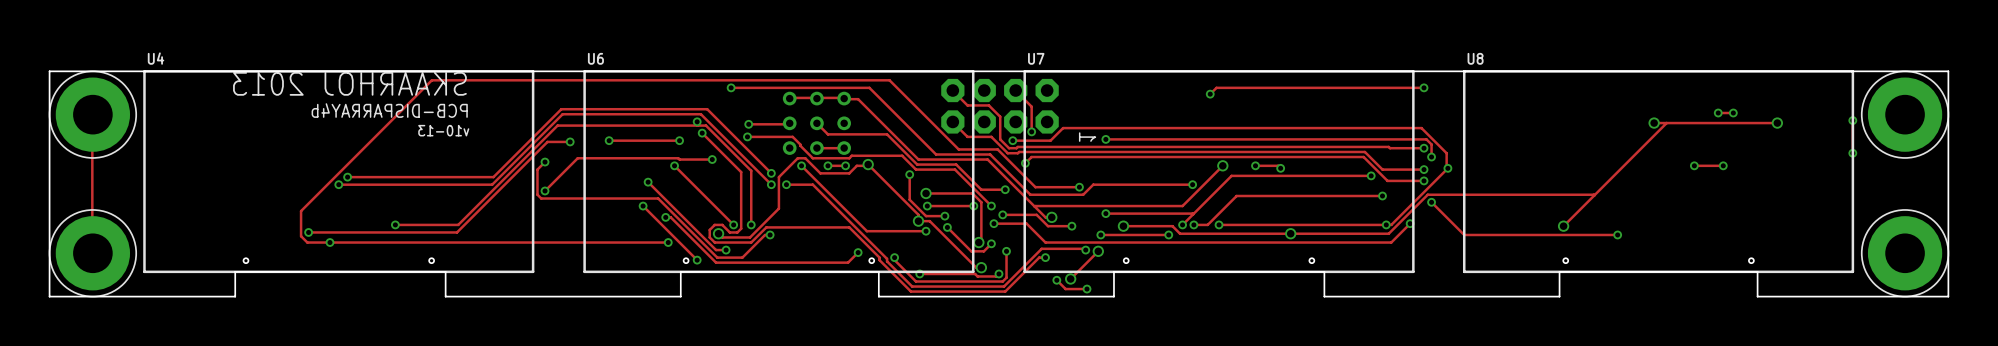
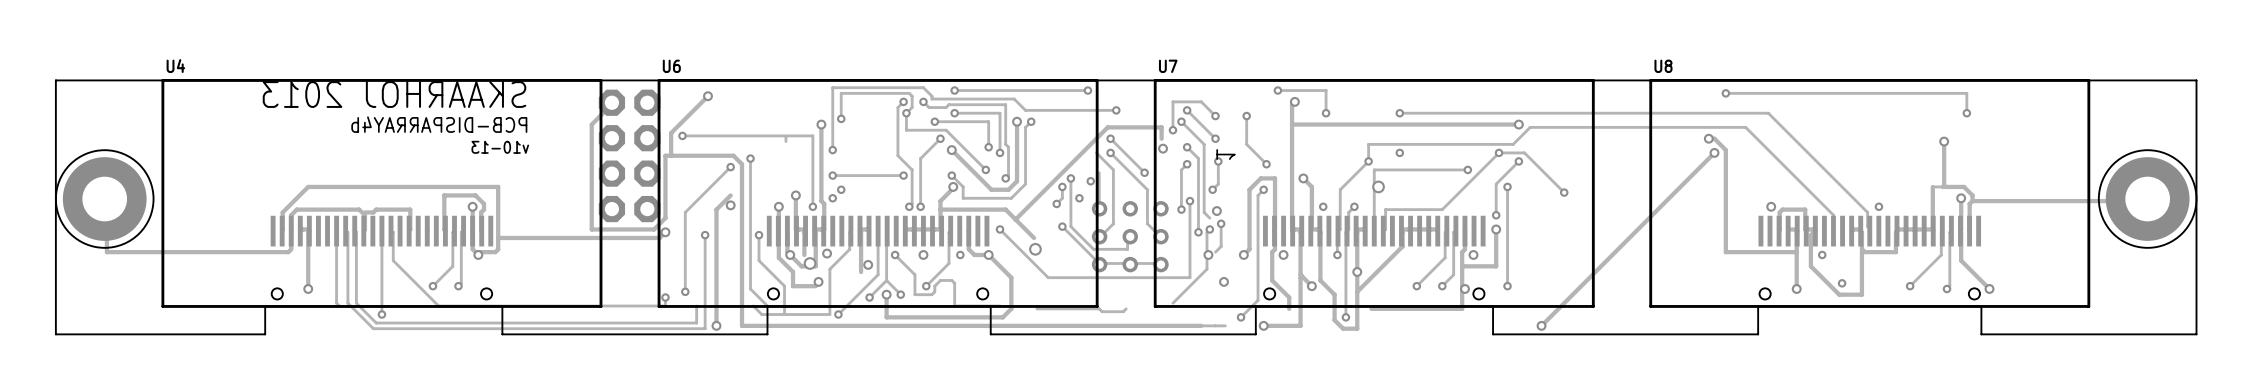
U4 footprint: [143, 70, 535, 274] -> [161, 79, 603, 308]
U6 footprint: [583, 70, 975, 274] -> [657, 79, 1099, 308]
U7 footprint: [1023, 70, 1415, 274] -> [1153, 79, 1595, 308]
U8 footprint: [1462, 70, 1855, 274] -> [1649, 79, 2091, 308]
track: (846, 80) (431, 80) (323, 188) -> (409, 231) (410, 209) (376, 209) (373, 212) (364, 212)
via: none -> (954, 90)
track: (889, 80) (958, 149) (997, 149) (1035, 187) (1079, 187) -> (1002, 90) (1087, 90)
via: none -> (1087, 90)
track: none -> (1277, 90) (1326, 90) (1326, 113)
via: none -> (1277, 90)
track: none -> (1725, 93) (1966, 93) (1966, 113)
via: none -> (1725, 93)
track: none -> (707, 96) (671, 133) (671, 155)
via: none -> (707, 96)
track: (731, 87) (826, 87) -> (832, 150) (832, 87) (923, 87) (931, 96) (931, 99)
via: (731, 87) -> none
track: (869, 87) (936, 154) (990, 154) (1030, 194) (1083, 194) (1093, 184) (1192, 184) -> (980, 99) (1014, 99) (1025, 110) (1116, 110)
track: (1424, 87) (1216, 87) (1210, 94) -> none
via: (1424, 87) -> none
track: none -> (903, 101) (897, 107) (897, 155) (912, 169) (912, 203) (909, 206)
via: none -> (903, 101)
track: none -> (923, 101) (929, 107) (946, 107) (948, 104) (1005, 104) (1005, 144) (1008, 147) (1008, 175) (1005, 178)
via: none -> (923, 101)
track: (952, 90) (967, 105) (988, 105) (1000, 116) (1000, 139) (1009, 148) (1424, 148) -> none
track: (1015, 90) (1031, 106) (1031, 131) -> none
track: none -> (1294, 101) (1292, 104) (1292, 229) (1292, 231) (1294, 229) (1301, 231) (1300, 274) (1311, 286)
via: none -> (1294, 101)
via: (1210, 94) -> none
via: none -> (1116, 110)
track: none -> (1187, 110) (1215, 138)
via: none -> (1187, 110)
track: (789, 98) (858, 99) (918, 159) (987, 159) (1045, 217) (1051, 217) -> none
via: none -> (906, 113)
track: none -> (954, 113) (1000, 113) (1000, 152)
via: none -> (954, 113)
via: none -> (1326, 113)
track: none -> (1399, 113) (1768, 113) (1867, 212) (1867, 226) (1869, 231)
via: none -> (1399, 113)
via: none -> (1966, 113)
track: none -> (1215, 116) (1201, 101) (1172, 101) (1172, 130)
via: none -> (1215, 116)
track: none -> (1246, 116) (1246, 144) (1266, 164)
via: none -> (1246, 116)
track: none -> (841, 118) (841, 93) (909, 93) (912, 96) (912, 107) (906, 113) (906, 130) (946, 130) (985, 169)
via: none -> (841, 118)
part: (999, 106) -> none
track: none -> (934, 121) (988, 121) (988, 147)
via: none -> (934, 121)
track: none -> (1017, 121) (1017, 181) (1008, 189) (991, 189) (951, 150)
via: none -> (1017, 121)
track: none -> (1031, 121) (1025, 127) (1025, 184) (1011, 198) (963, 198) (963, 186) (951, 175)
via: none -> (1031, 121)
track: none -> (1181, 121) (1204, 144) (1204, 212) (1209, 218)
via: none -> (1181, 121)
track: none -> (821, 124) (821, 201) (824, 203) (824, 229) (823, 231) (821, 229) (814, 231) (815, 266) (801, 266) (787, 252) (787, 231)
via: none -> (821, 124)
track: none -> (1292, 124) (1518, 124)
via: none -> (1518, 124)
track: (1718, 113) (1733, 113) -> none
via: (1718, 113) -> none
via: (1733, 113) -> none
track: (92, 114) (92, 253) -> none
part: (92, 114) -> none
part: (1905, 114) -> none
via: none -> (1172, 130)
track: none -> (682, 135) (812, 135) (812, 206)
via: none -> (682, 135)
via: (1852, 120) -> none
via: (697, 121) -> none
track: (952, 121) (967, 136) (991, 136) (1007, 153) (1364, 151) (1382, 169) (1424, 169) -> none
track: (789, 123) (748, 124) -> none
track: (816, 123) (827, 134) (887, 134) (917, 164) (956, 164) (981, 189) (1005, 189) -> none
part position: (816, 123) -> (1130, 236)
track: none -> (940, 138) (920, 158) (920, 206)
via: none -> (940, 138)
track: none -> (1110, 138) (1144, 172)
via: none -> (1110, 138)
track: none -> (1161, 138) (1161, 127) (1107, 127) (1015, 219)
via: none -> (1215, 138)
track: none -> (1708, 138) (1714, 138) (1725, 150) (1725, 252) (1796, 252)
via: none -> (1708, 138)
track: (1654, 123) (1777, 123) -> none
via: (1654, 123) -> none
track: (1666, 123) (1563, 226) -> none
via: (1777, 123) -> none
via: (748, 124) -> none
track: none -> (1944, 141) (1944, 186)
via: none -> (1944, 141)
track: (1214, 128) (1063, 128) (1050, 140) (1012, 140) -> (1368, 144) (1368, 161) (1340, 189) (1340, 229) (1337, 232) (1337, 254)
track: (1342, 128) (1421, 128) (1446, 153) (1447, 168) (1391, 224) (1219, 224) -> (1513, 144) (1530, 127) (1745, 127) (1833, 215) (1833, 231)
via: none -> (988, 147)
track: none -> (1187, 147) (1198, 158) (1198, 232)
via: none -> (1187, 147)
track: (702, 133) (741, 172) (741, 228) (737, 232) (729, 232) (722, 224) (714, 224) (709, 229) (709, 237) (714, 242) (751, 242) (766, 227) (849, 227) (910, 291) (1005, 291) (1039, 257) (1045, 257) -> none
via: (702, 133) -> none
via: none -> (832, 150)
via: none -> (951, 150)
via: none -> (1000, 152)
track: none -> (1096, 152) (1113, 169) (1113, 223) (1099, 236)
track: none -> (1110, 152) (1147, 189) (1147, 223) (1160, 236)
via: none -> (1110, 152)
via: none -> (1399, 152)
via: none -> (1499, 152)
track: none -> (1714, 152) (1541, 325)
via: none -> (1714, 152)
track: (747, 136) (792, 136) (812, 158) (902, 155) (915, 169) (954, 169) (991, 206) -> none
via: (747, 136) -> none
part: none -> (629, 155)
track: (1105, 139) (1426, 139) (1431, 144) (1431, 157) -> none
via: (1105, 139) -> none
track: (609, 140) (679, 140) -> none
via: (609, 140) -> none
track: none -> (750, 158) (750, 289) (767, 306)
via: none -> (750, 158)
via: (679, 140) -> none
via: (1012, 140) -> none
track: (570, 141) (547, 141) (456, 232) (308, 232) -> none
via: (570, 141) -> none
track: none -> (1218, 161) (1218, 184) (1212, 189)
via: none -> (1218, 161)
via: none -> (1368, 161)
track: none -> (1518, 161) (1496, 184) (1496, 215)
via: none -> (1518, 161)
track: none -> (1187, 164) (1181, 169) (1181, 209)
via: none -> (1187, 164)
via: none -> (1266, 164)
track: none -> (730, 167) (685, 212) (685, 291)
via: none -> (730, 167)
track: (816, 148) (844, 148) -> none
via: (1424, 148) -> none
via: none -> (985, 169)
track: none -> (1467, 169) (1374, 169) (1374, 231)
via: none -> (1467, 169)
track: none -> (1099, 172) (1099, 208)
via: none -> (1144, 172)
via: (1852, 153) -> none
track: none -> (832, 175) (903, 175)
via: none -> (832, 175)
via: none -> (903, 175)
via: none -> (951, 175)
via: (1431, 157) -> none
via: none -> (1005, 178)
track: none -> (1070, 178) (1070, 226) (1093, 249) (1127, 249) (1127, 237) (1130, 236)
via: none -> (1070, 178)
track: none -> (1303, 178) (1311, 186) (1311, 229) (1317, 229) (1320, 232) (1320, 280) (1334, 294) (1334, 320) (1343, 328) (1357, 328) (1356, 231) (1357, 229) (1365, 231)
via: none -> (1303, 178)
track: (712, 159) (577, 158) (545, 190) -> none
via position: (712, 159) -> (795, 195)
via: none -> (1090, 181)
track: (545, 162) (537, 169) (537, 194) (541, 198) (658, 198) (717, 257) (742, 257) (765, 234) (770, 234) -> none
via: (545, 162) -> none
track: (1025, 163) (1031, 157) (1363, 157) (1387, 180) (1424, 180) -> none
via: (1025, 163) -> none
via: (868, 164) -> none
track: (674, 165) (733, 224) -> none
via: (674, 165) -> none
track: (801, 165) (866, 231) (926, 231) -> none
via: (801, 165) -> none
track: (827, 165) (845, 165) -> none
via: (827, 165) -> none
track: none -> (1062, 186) (1062, 198) (1056, 203)
via: none -> (1062, 186)
track: (1222, 165) (1182, 206) (1034, 206) -> none
track: (1255, 165) (1278, 165) (1280, 168) -> none
via: (1255, 165) -> none
track: none -> (1507, 186) (1507, 286)
via: none -> (1507, 186)
track: (1694, 165) (1714, 165) -> (1932, 229) (1932, 186)
via: (1694, 165) -> none
track: none -> (1942, 186) (1964, 186) (1972, 195) (1972, 201)
via position: (1723, 165) -> (1961, 198)
via: none -> (841, 189)
track: none -> (951, 189) (940, 201) (940, 229) (932, 231) (931, 229) (914, 229) (914, 231) (906, 229) (905, 231)
via: none -> (1212, 189)
track: none -> (1263, 189) (1258, 195) (1258, 300) (1241, 317)
via: none -> (1263, 189)
via: (1280, 168) -> none
via: (1447, 168) -> none
via: (1424, 169) -> none
track: none -> (1564, 192) (1524, 152) (1499, 152) (1442, 209) (1385, 209) (1385, 229) (1383, 231)
via: none -> (1564, 192)
track: none -> (730, 195) (716, 209) (716, 325)
track: none -> (795, 195) (795, 229) (796, 231) (798, 229) (805, 231) (804, 254)
track: (771, 173) (707, 109) (561, 109) (493, 177) (347, 177) -> none
via: (771, 173) -> none
track: (909, 174) (909, 199) (926, 216) (944, 216) -> none
via: (909, 174) -> none
via: none -> (832, 198)
via: none -> (1079, 198)
track: (1371, 175) (1231, 175) (1182, 224) -> none
via: (1371, 175) -> none
track: none -> (1961, 198) (1961, 260) (1989, 289)
track: none -> (104, 199) (106, 201) (106, 252) (288, 252) (291, 249) (291, 215) (296, 209) (359, 209) (364, 215) (363, 231)
part: none -> (104, 199)
track: none -> (2147, 199) (2145, 201) (1972, 201)
part: none -> (2147, 199)
via: (347, 177) -> none
track: none -> (1189, 201) (1189, 277) (1048, 277) (1000, 229)
via: none -> (1189, 201)
track: none -> (1972, 201) (1969, 203) (1969, 231)
via: none -> (1056, 203)
via: (1424, 180) -> none
track: (648, 182) (716, 250) (726, 250) -> none
track: none -> (472, 206) (472, 249) (478, 254) (478, 252) (495, 252) (498, 249) (498, 186) (308, 186) (282, 212) (282, 231)
via: none -> (472, 206)
track: none -> (778, 206) (778, 257) (793, 271) (793, 286) (815, 286)
via: none -> (778, 206)
via: none -> (812, 206)
via: none -> (909, 206)
via: none -> (920, 206)
via: none -> (1323, 206)
track: none -> (1354, 206) (1348, 212) (1348, 229) (1345, 232) (1345, 317)
via: none -> (1354, 206)
via: none -> (1771, 206)
via: none -> (1878, 206)
track: (338, 184) (492, 184) (562, 114) (700, 114) (771, 184) -> none
via: (338, 184) -> none
via: (771, 184) -> none
track: (786, 184) (812, 184) (912, 286) (1004, 286) (1041, 248) (1085, 250) -> none
via: (786, 184) -> none
via: (1192, 184) -> none
track: none -> (940, 209) (1005, 209) (1034, 237)
via: none -> (1181, 209)
track: (322, 189) (301, 211) (301, 236) (307, 242) (668, 242) -> none
via: (1005, 189) -> none
via: (545, 190) -> none
via: none -> (1496, 215)
track: (926, 193) (972, 193) (981, 202) (981, 240) (978, 242) -> none
via: (926, 193) -> none
track: (1594, 195) (1427, 194) (1388, 233) (1180, 233) (1172, 226) (1123, 226) -> none
track: (1382, 196) (1236, 196) (1207, 224) (1193, 224) -> none
via: (1382, 196) -> none
track: none -> (1221, 223) (1221, 246) (1215, 252)
via: none -> (1221, 223)
track: none -> (1062, 226) (1099, 264) (1160, 264)
via: none -> (1062, 226)
track: (1431, 202) (1464, 234) (1617, 234) -> none
via: (1431, 202) -> none
track: none -> (968, 229) (968, 249) (974, 254) (988, 254) (1011, 277) (1011, 308) (1002, 317) (886, 317) (886, 294)
via: none -> (1000, 229)
track: none -> (1209, 229) (1206, 232) (1206, 269) (1172, 303)
via: none -> (1209, 229)
track: none -> (1465, 229) (1465, 249) (1462, 252) (1462, 286) (1465, 289) (1462, 289) (1462, 308) (1371, 308)
track: none -> (1496, 229) (1496, 266) (1462, 266)
via: none -> (1496, 229)
track: none -> (1932, 229) (1915, 229) (1915, 231) (1898, 229) (1895, 232) (1895, 252) (1864, 252) (1861, 249) (1861, 232) (1859, 229) (1851, 231)
track: none -> (300, 231) (302, 229) (309, 231) (308, 289)
track: none -> (336, 231) (336, 303) (339, 306)
track: none -> (345, 231) (347, 232) (347, 303) (373, 328) (705, 328) (705, 235)
track: none -> (354, 231) (356, 232) (356, 303) (376, 323) (696, 323) (696, 306)
track: none -> (381, 231) (381, 314)
track: none -> (391, 231) (393, 232) (393, 260) (438, 306) (665, 306) (665, 297)
track: none -> (445, 231) (444, 195) (475, 195) (484, 203) (484, 209) (481, 212) (481, 231)
track: none -> (454, 231) (452, 232) (452, 266) (432, 286)
track: none -> (463, 231) (461, 232) (461, 283) (458, 286)
track: none -> (850, 231) (849, 249) (829, 269) (829, 314) (761, 314) (753, 306)
track: none -> (869, 231) (866, 229) (859, 231) (861, 271)
track: (778, 205) (778, 177) (797, 158) (805, 158) (820, 173) (849, 173) (856, 165) (868, 164) (918, 214) (918, 221) (929, 221) (976, 267) (981, 267) -> none
track: none -> (887, 231) (886, 280)
track: none -> (950, 231) (948, 232) (948, 263) (926, 286)
track: none -> (1437, 231) (1436, 229) (1428, 231) (1428, 229) (1411, 229) (1410, 231) (1402, 229) (1402, 246) (1357, 291)
track: none -> (1446, 231) (1445, 232) (1445, 257) (1416, 286)
track: none -> (1455, 231) (1453, 232) (1453, 274) (1442, 286)
track: none -> (1779, 231) (1779, 212) (1782, 209) (1805, 209) (1805, 229) (1815, 231) (1810, 235) (1810, 266) (1839, 294) (1861, 294) (1863, 250)
track: none -> (1788, 231) (1788, 229) (1796, 229) (1797, 231) (1796, 289)
track: none -> (1942, 231) (1941, 254) (1910, 286)
track: none -> (1951, 231) (1949, 232) (1949, 286) (1946, 289)
track: none -> (665, 232) (659, 237) (498, 237)
via: none -> (665, 232)
track: (643, 206) (697, 260) -> none
via: (643, 206) -> none
track: (927, 206) (973, 206) -> none
via: (927, 206) -> none
via: (973, 206) -> none
via: (991, 206) -> none
via: none -> (1198, 232)
via: none -> (705, 235)
track: none -> (759, 235) (759, 260) (784, 286) (784, 314)
via: none -> (759, 235)
track: (778, 208) (749, 237) (722, 237) (718, 233) -> (878, 235) (878, 274) (838, 314)
track: (1105, 213) (1193, 214) -> none
via: (1105, 213) -> none
track: (1002, 214) (1036, 214) (1048, 226) (1071, 226) -> none
via: (1002, 214) -> none
via: (944, 216) -> none
track: (665, 217) (670, 217) (716, 262) (848, 262) (858, 252) -> none
via: (665, 217) -> none
via: (1051, 217) -> none
track: (993, 223) (1026, 223) (1045, 242) (1391, 242) (1410, 223) -> none
via: (993, 223) -> none
via: (1410, 223) -> none
track: (395, 224) (458, 224) (557, 125) (705, 125) (751, 170) (751, 224) -> none
via: (395, 224) -> none
via: (751, 224) -> none
via: (1182, 224) -> none
via: (1193, 224) -> none
via: (1219, 224) -> none
via: (1386, 224) -> none
via: none -> (478, 254)
via: none -> (790, 254)
track: none -> (895, 254) (914, 274) (914, 294) (931, 294) (934, 291) (934, 286) (940, 280) (951, 280) (954, 283) (954, 306) (1000, 306)
via: none -> (895, 254)
via: none -> (923, 254)
via: none -> (960, 254)
via: none -> (988, 254)
track: none -> (1243, 254) (1249, 249) (1249, 189) (1260, 178) (1275, 178) (1275, 249) (1272, 252) (1272, 280) (1289, 297) (1289, 308)
via: none -> (1243, 254)
via: (1123, 226) -> none
via: none -> (1283, 254)
via: none -> (1337, 254)
via: none -> (1473, 254)
via: (1563, 226) -> none
via: none -> (1822, 254)
track: (947, 227) (971, 251) (983, 251) (991, 243) -> none
via: (947, 227) -> none
via: (926, 231) -> none
via: (308, 232) -> none
via: (1290, 233) -> none
track: (1100, 234) (1168, 234) -> none
via: (1100, 234) -> none
via: (1168, 234) -> none
via position: (1617, 234) -> (1796, 289)
via: none -> (1357, 271)
via: (329, 242) -> none
via: (668, 242) -> none
via: (978, 242) -> none
via: (991, 243) -> none
track: none -> (1301, 276) (1300, 325) (1263, 325)
track: none -> (886, 280) (869, 297)
track: none -> (886, 280) (900, 294)
track: (1006, 251) (1006, 277) (1002, 281) (915, 281) (894, 260) (894, 257) -> none
via: (1006, 251) -> none
track: (1098, 251) (1070, 278) -> none
via: (1098, 251) -> none
via: none -> (1842, 283)
via: (858, 252) -> none
part: (92, 253) -> none
via: none -> (432, 286)
via: none -> (458, 286)
via: none -> (926, 286)
via: none -> (1311, 286)
via: none -> (1416, 286)
via: none -> (1442, 286)
via: none -> (1507, 286)
via: none -> (1910, 286)
part: (1905, 253) -> none
via: none -> (308, 289)
via: none -> (1465, 289)
via: none -> (1946, 289)
via: none -> (1989, 289)
via: (894, 257) -> none
via: (1045, 257) -> none
via: none -> (685, 291)
via: (697, 260) -> none
via: none -> (886, 294)
via: none -> (900, 294)
via: none -> (665, 297)
via: none -> (869, 297)
via: (981, 267) -> none
via: (919, 273) -> none
via: (998, 273) -> none
via: none -> (381, 314)
via: none -> (838, 314)
via: (1070, 278) -> none
track: (1056, 280) (1065, 289) -> (611, 102) (591, 124) (591, 229) (654, 229) (665, 218) (665, 155) (733, 155) (742, 164) (742, 325) (1201, 325)
via: (1056, 280) -> none
via: none -> (1241, 317)
via: none -> (1345, 317)
via: none -> (716, 325)
via: (1087, 289) -> none
via: none -> (1263, 325)
via: none -> (1541, 325)

